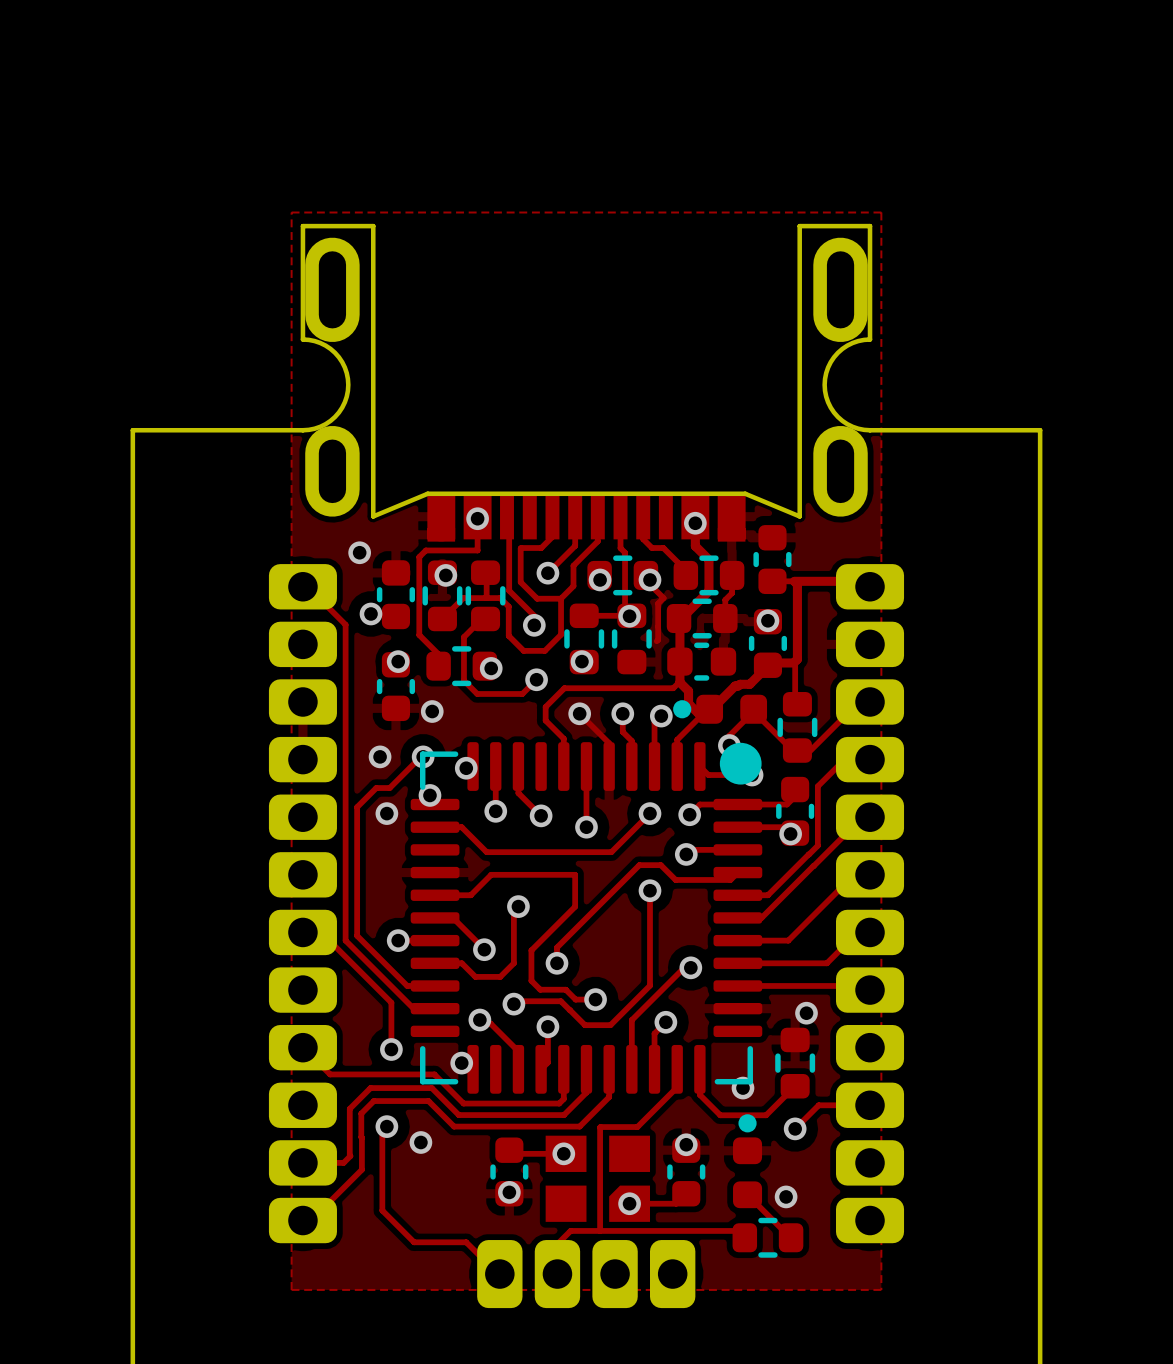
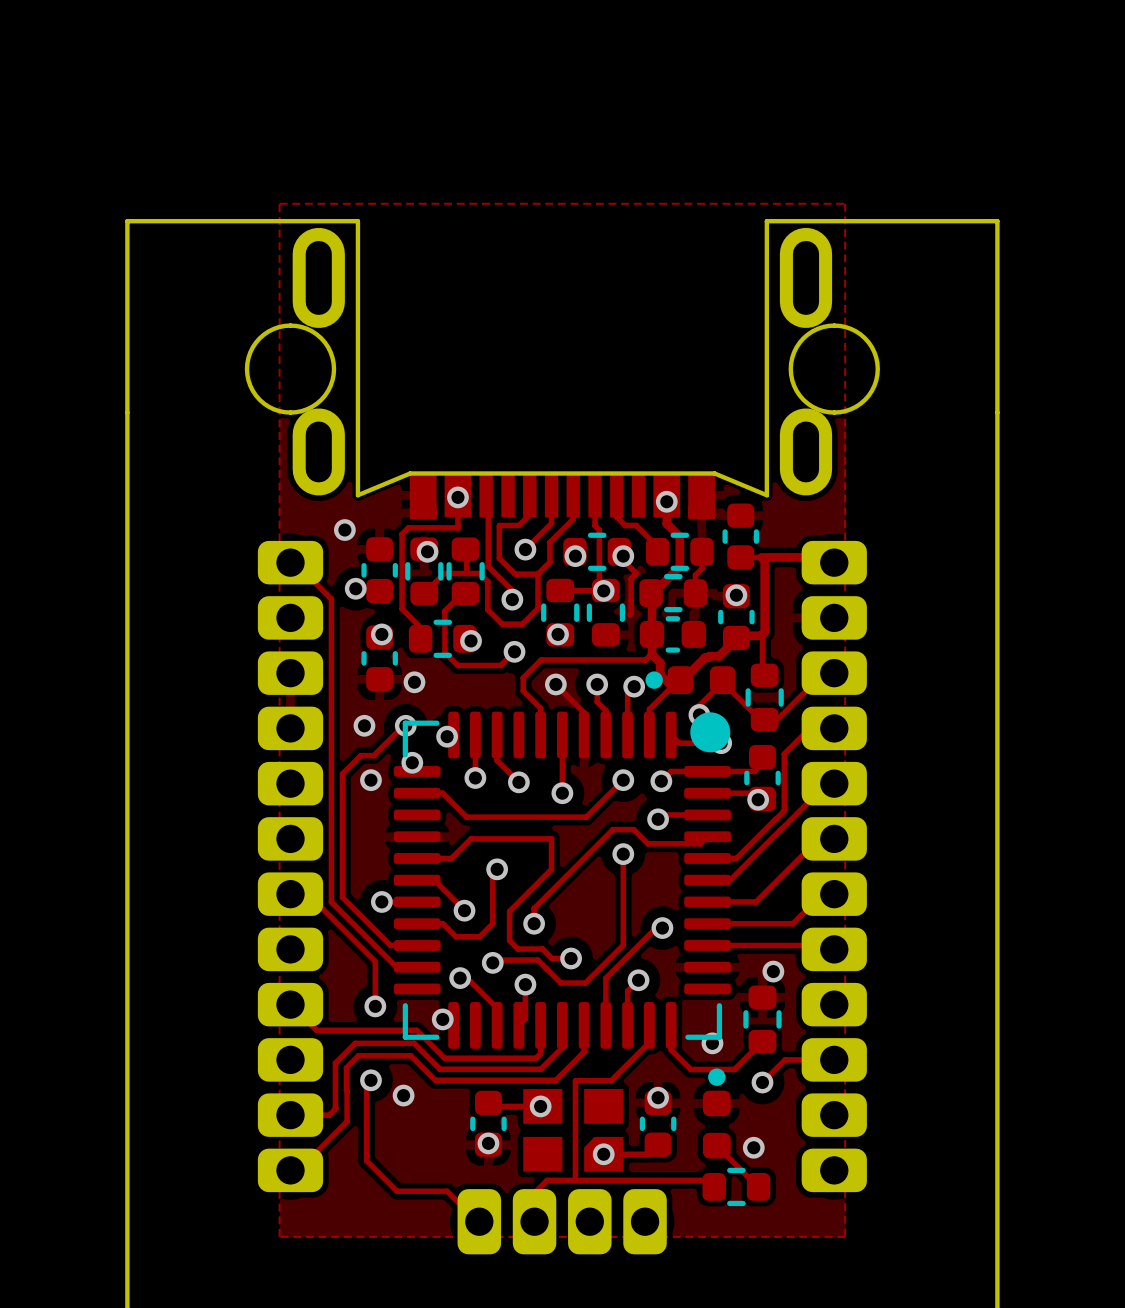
board edge: (373, 230) (373, 226) (302, 226) (302, 339) -> (357, 221) (127, 221) (127, 412)
board edge: (799, 230) (799, 226) (870, 226) (870, 339) -> (766, 221) (997, 221) (997, 412)
board edge: (132, 430) (302, 430) -> (290, 325) (273, 328) (259, 338) (250, 352) (247, 369) (250, 385) (259, 399) (273, 409) (290, 412)
board edge: (870, 430) (1040, 430) -> (834, 412) (850, 409) (865, 399) (874, 385) (877, 369) (874, 352) (865, 338) (850, 328) (834, 325)

